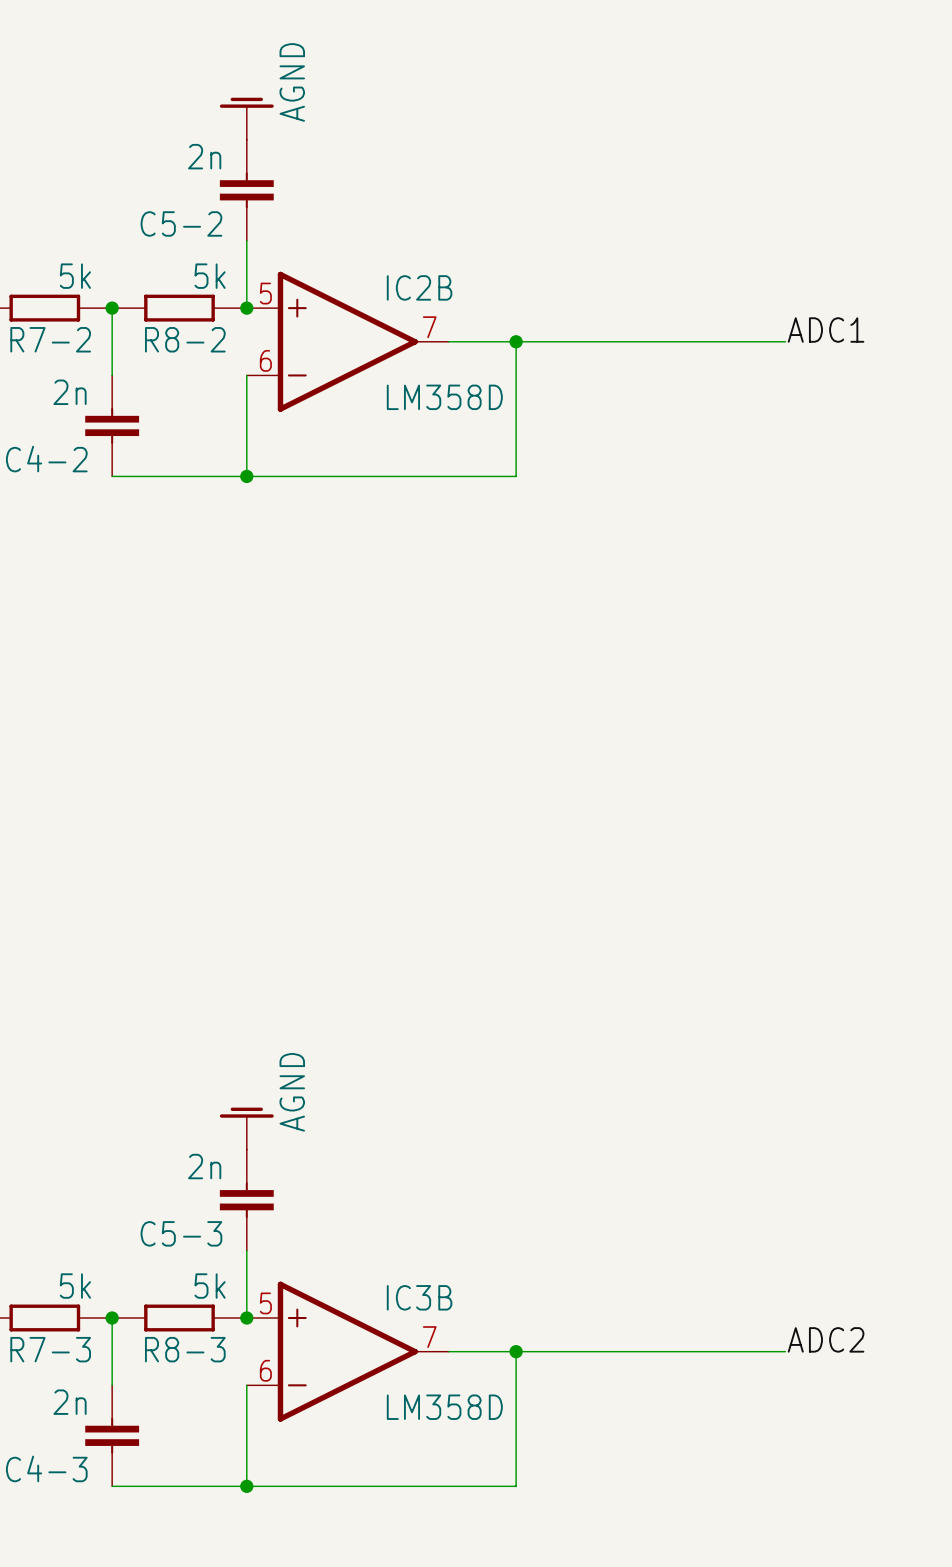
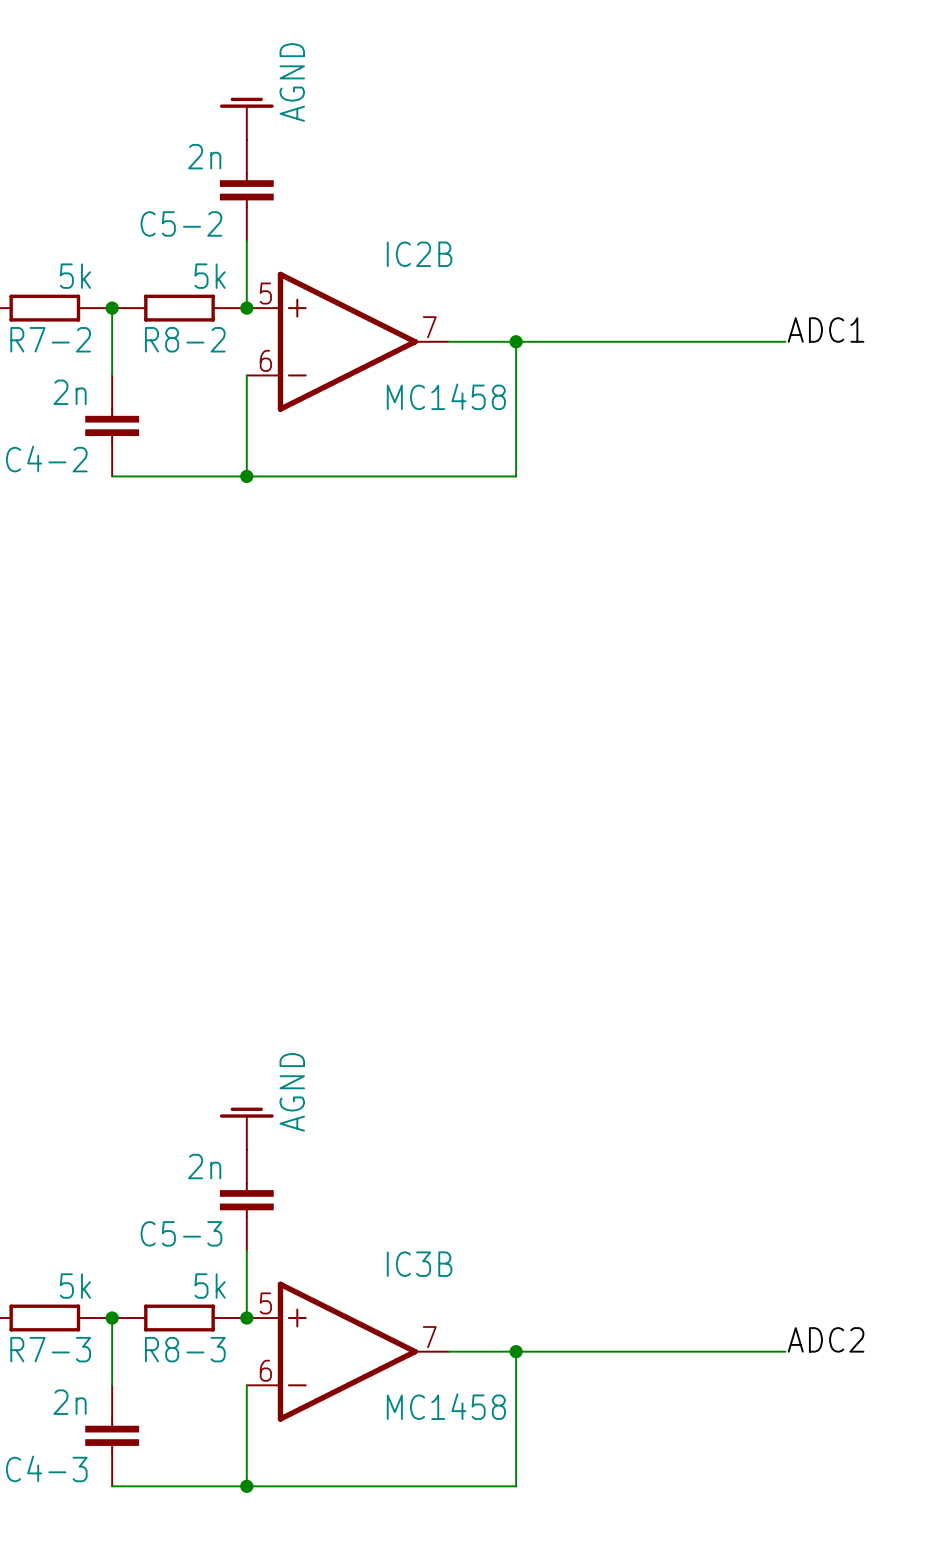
IC2B name position: IC2B (419, 287) -> IC2B (419, 254)
IC2B value: LM358D (444, 397) -> MC1458 (446, 396)
IC3B name position: IC3B (419, 1297) -> IC3B (419, 1264)
IC3B value: LM358D (444, 1407) -> MC1458 (446, 1406)

